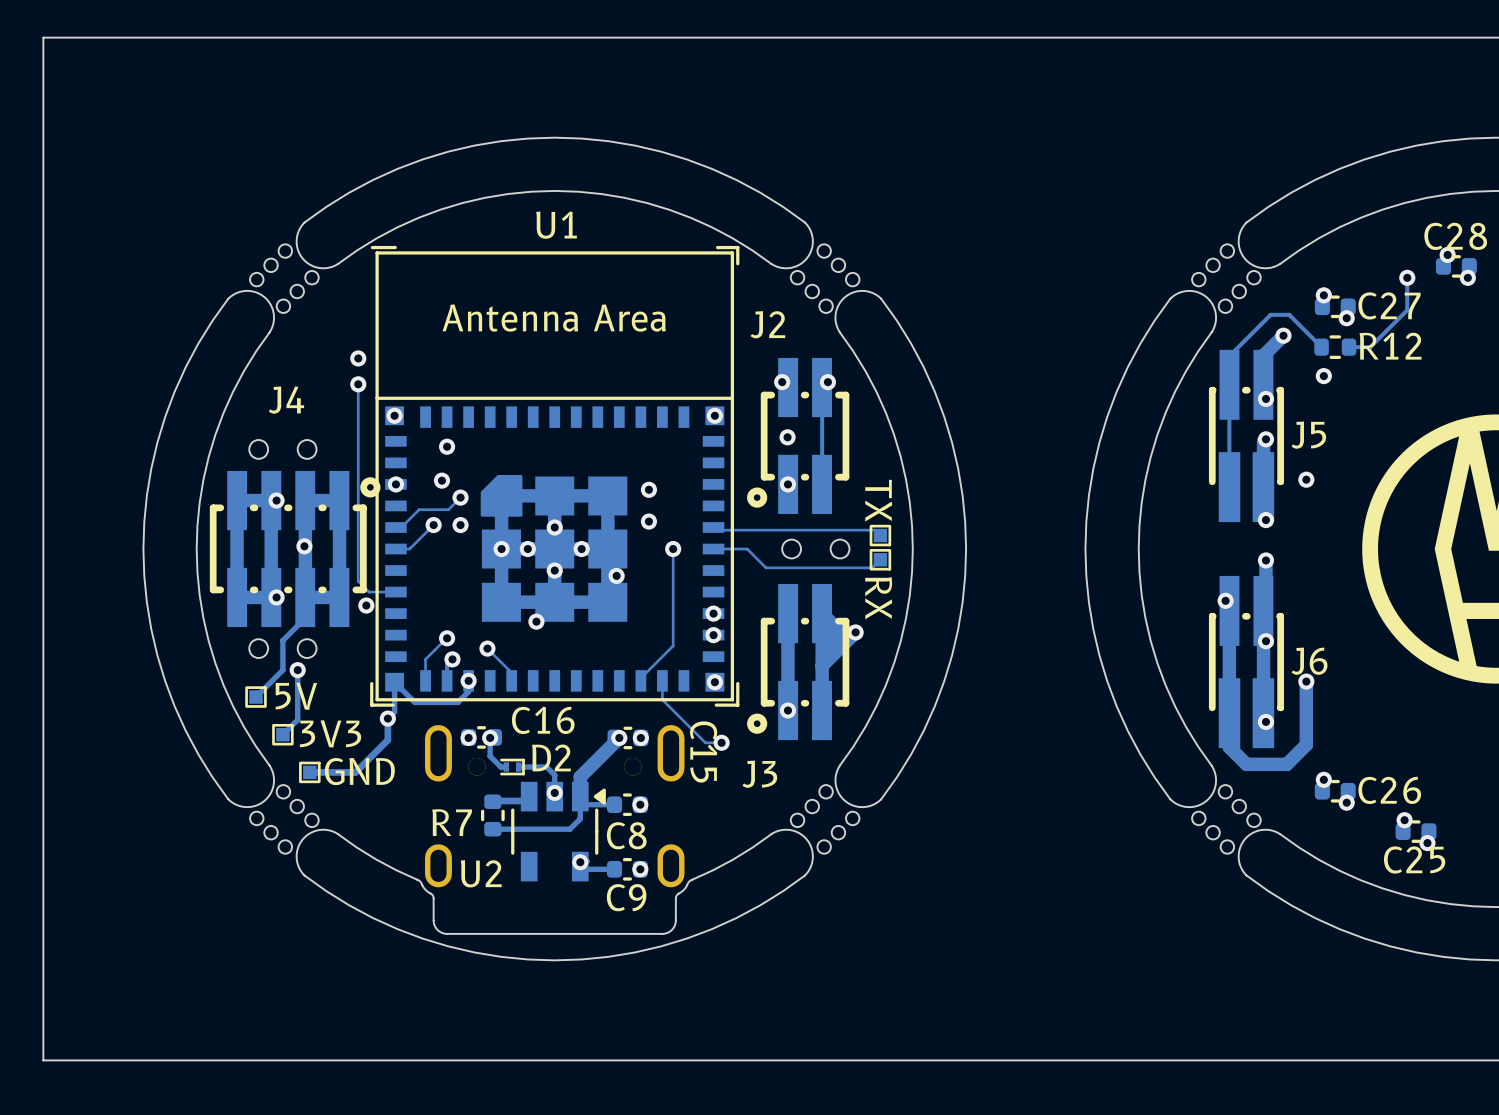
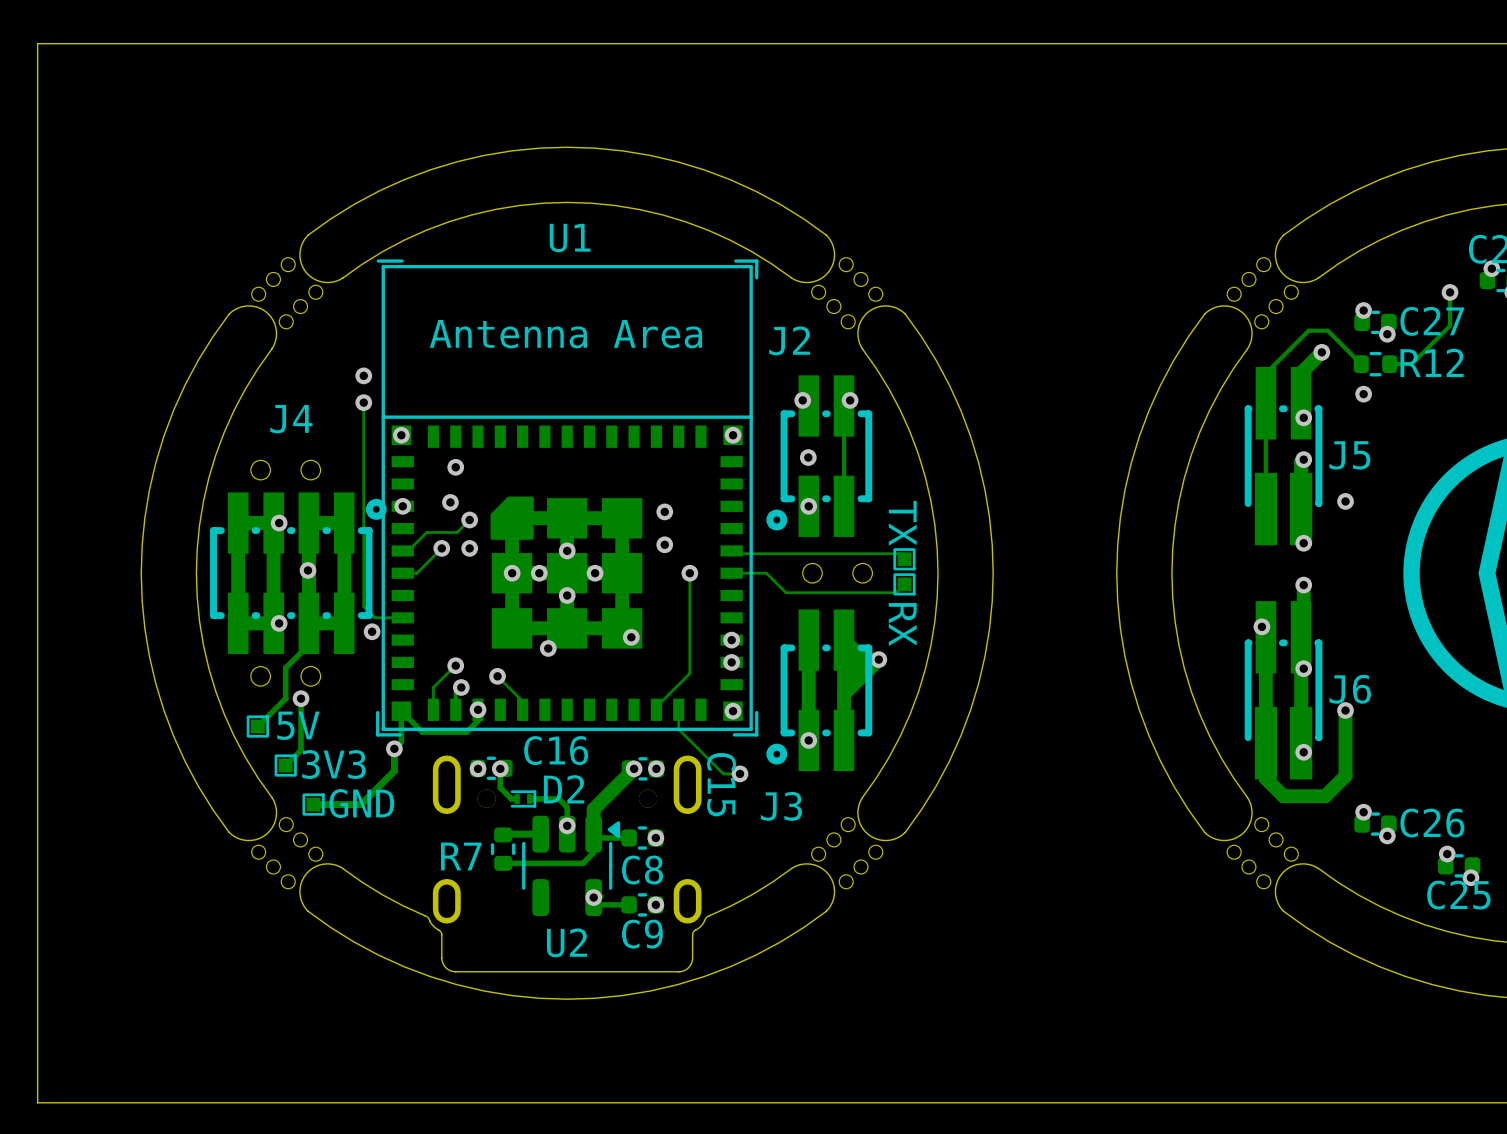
via position: (616, 575) -> (631, 637)
U2 footprint: [511, 781, 606, 882] -> [522, 815, 621, 917]
U2 name position: U2 (481, 873) -> U2 (566, 942)

